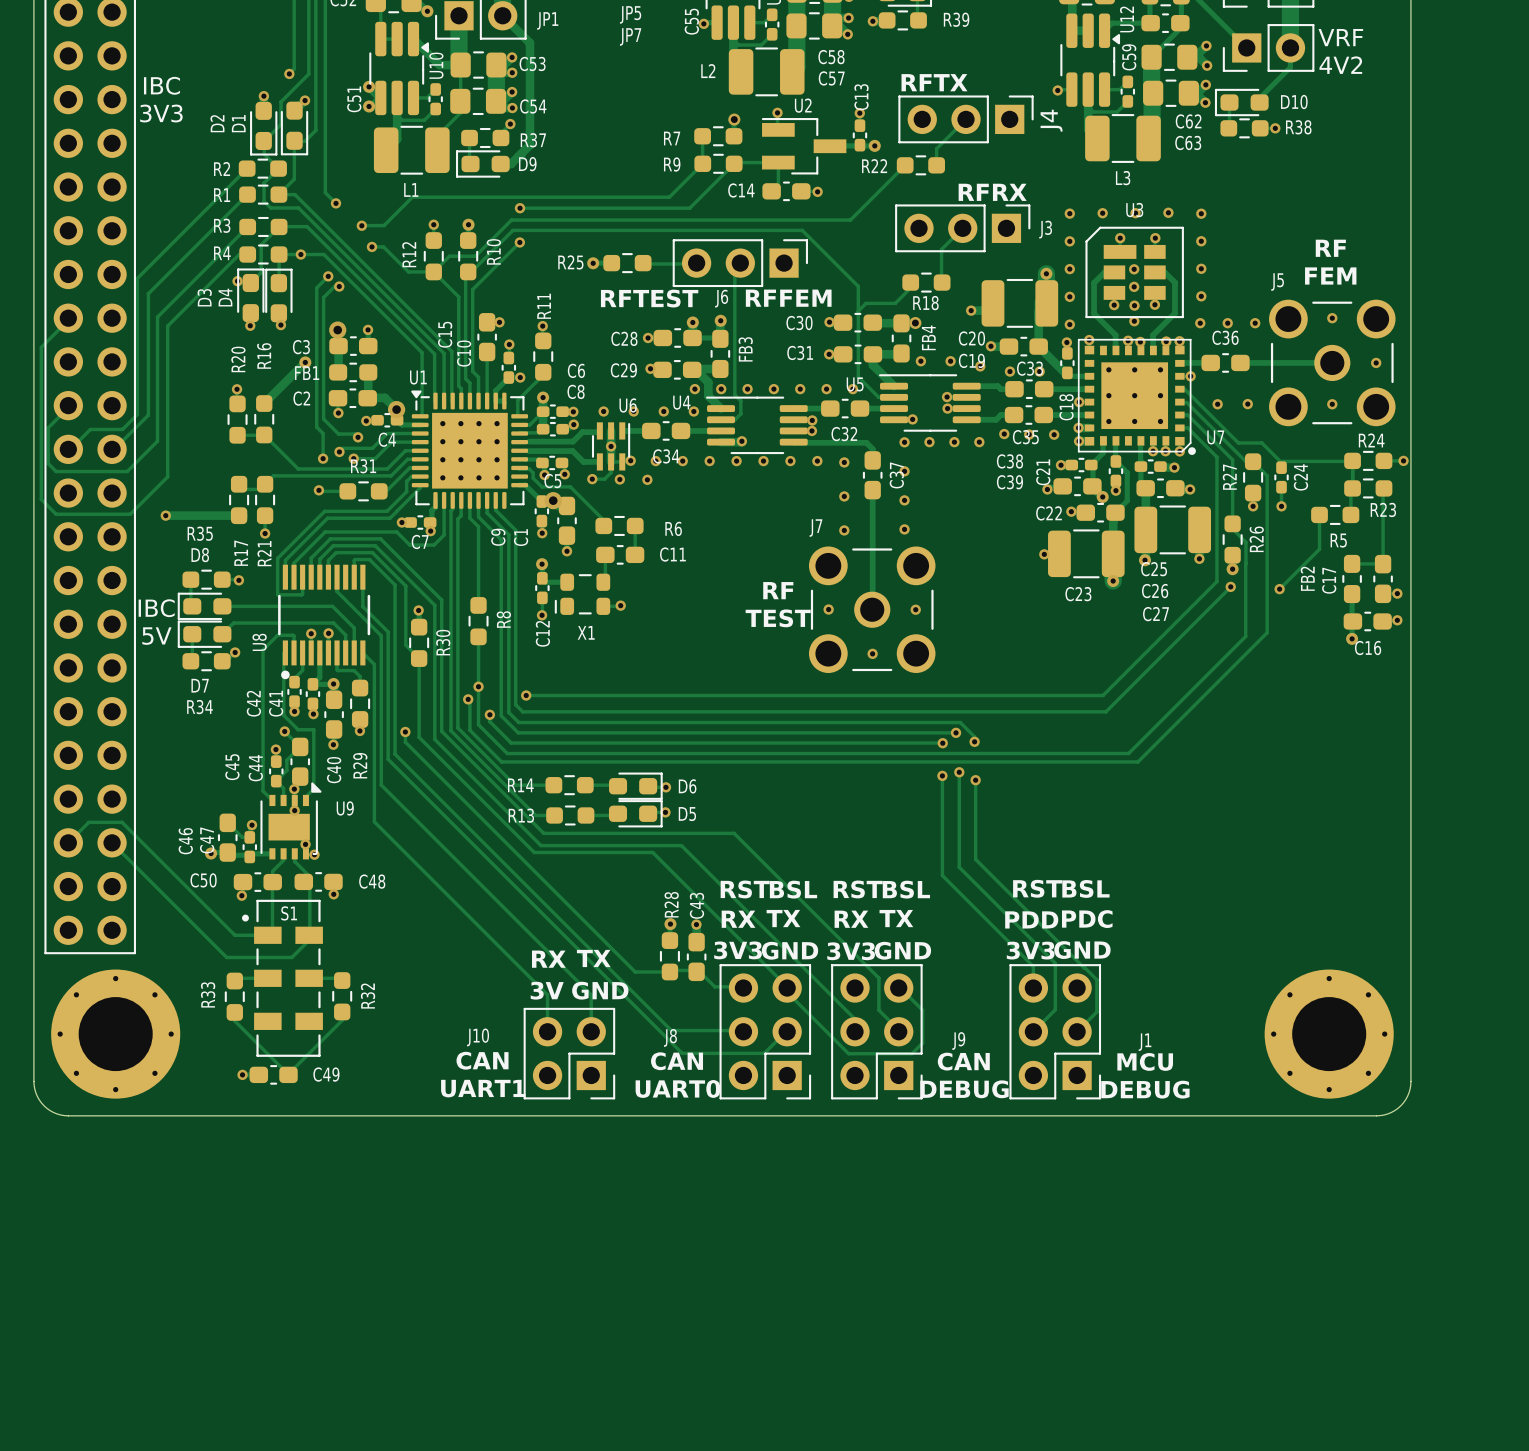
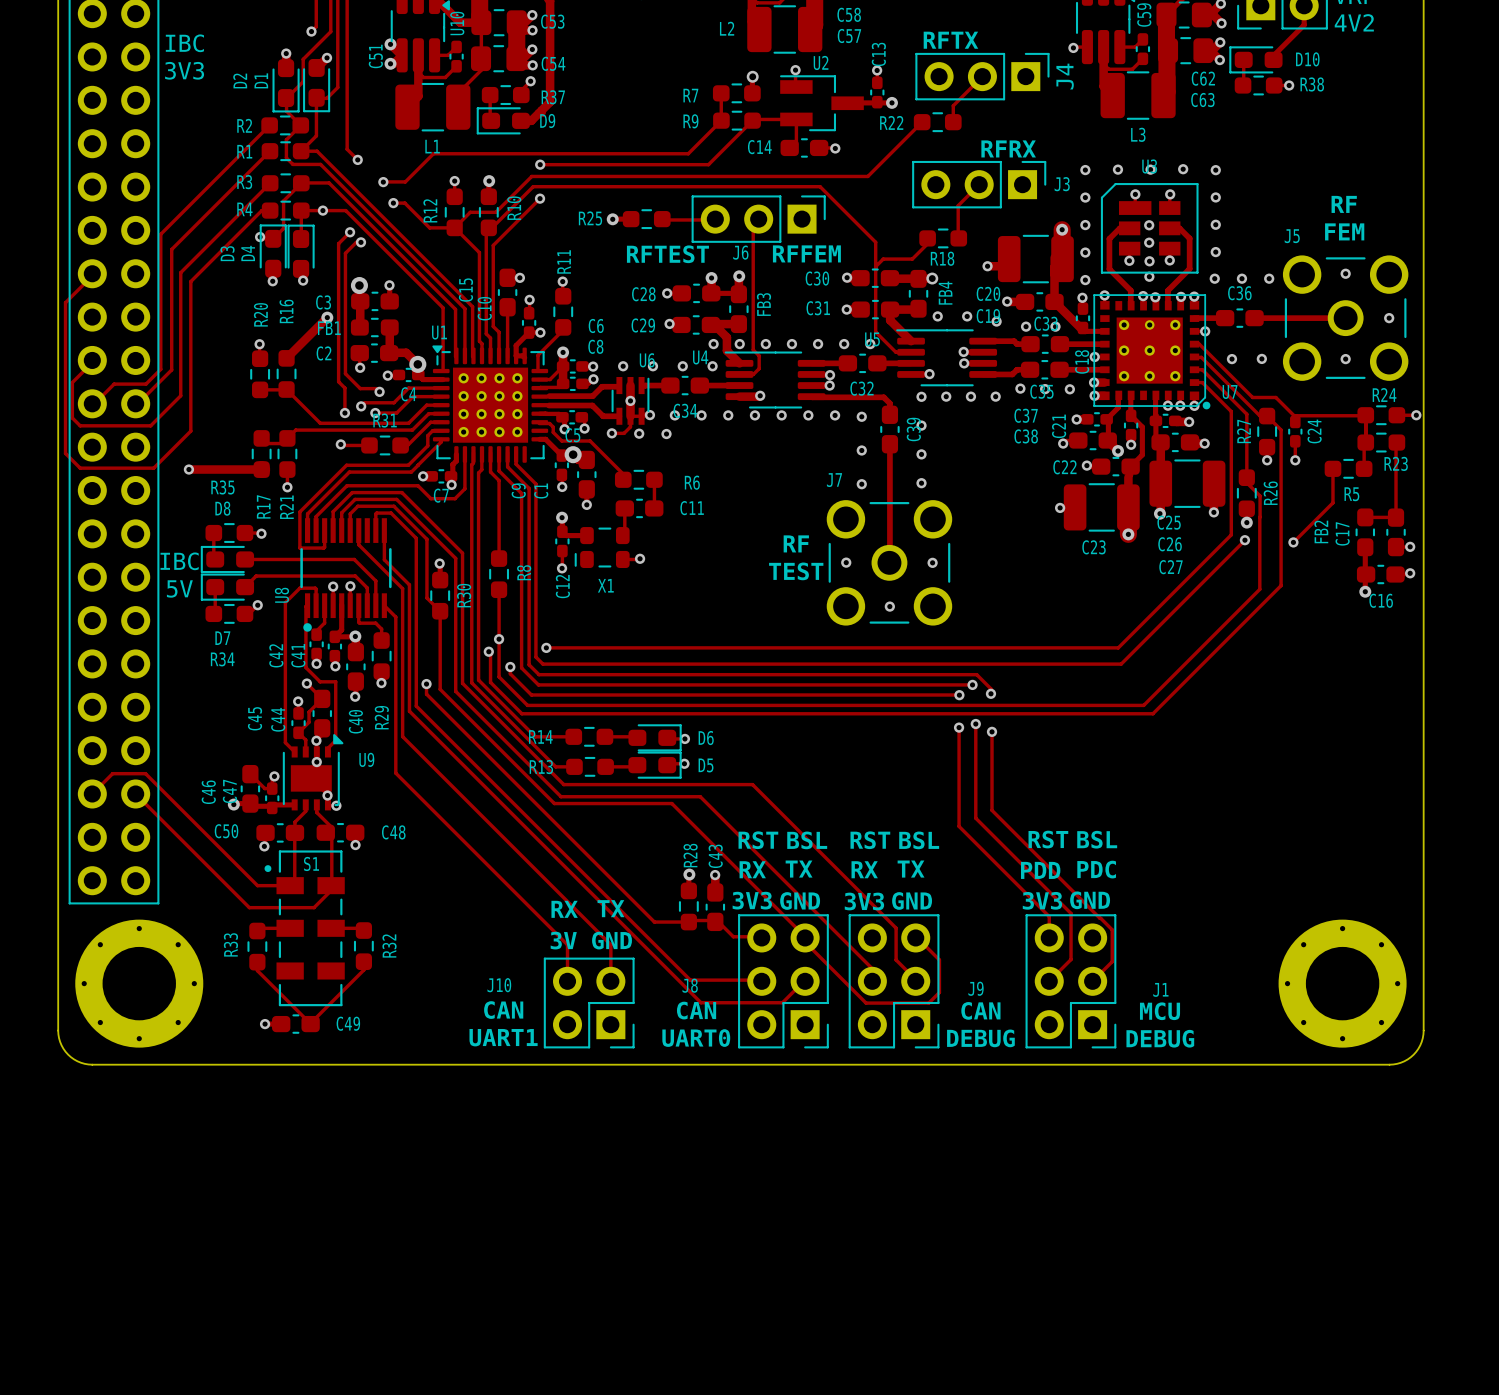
C38 name: C38 (1009, 461) -> C37 (1026, 415)
C37 name: C37 (896, 475) -> C39 (913, 429)
C39 name: C39 (1009, 482) -> C38 (1026, 436)

